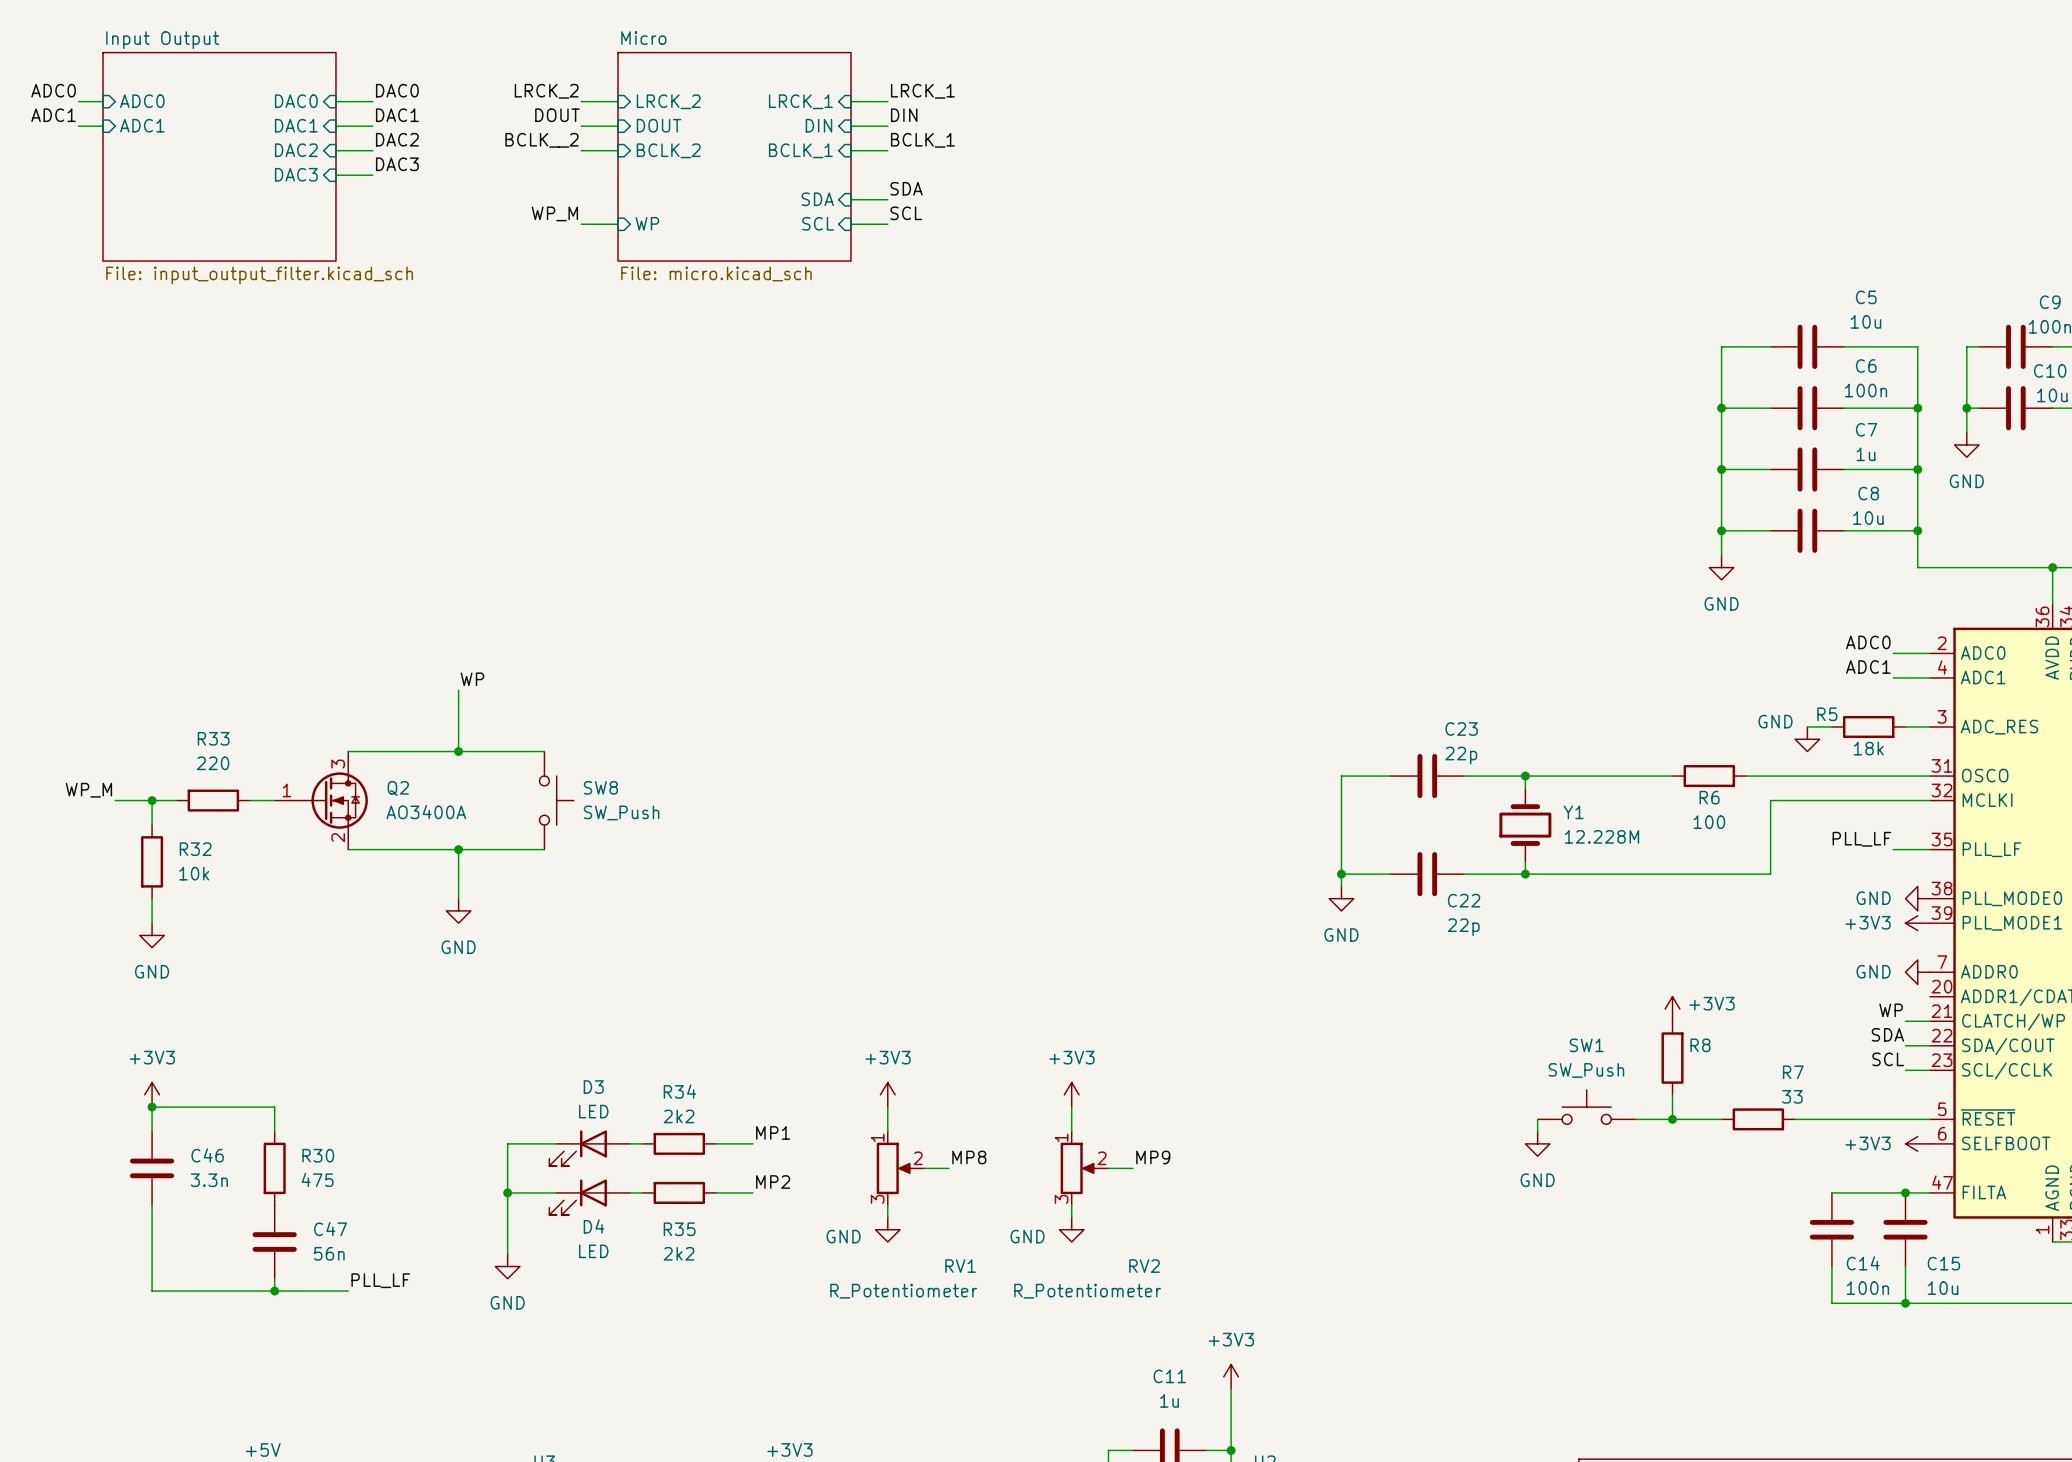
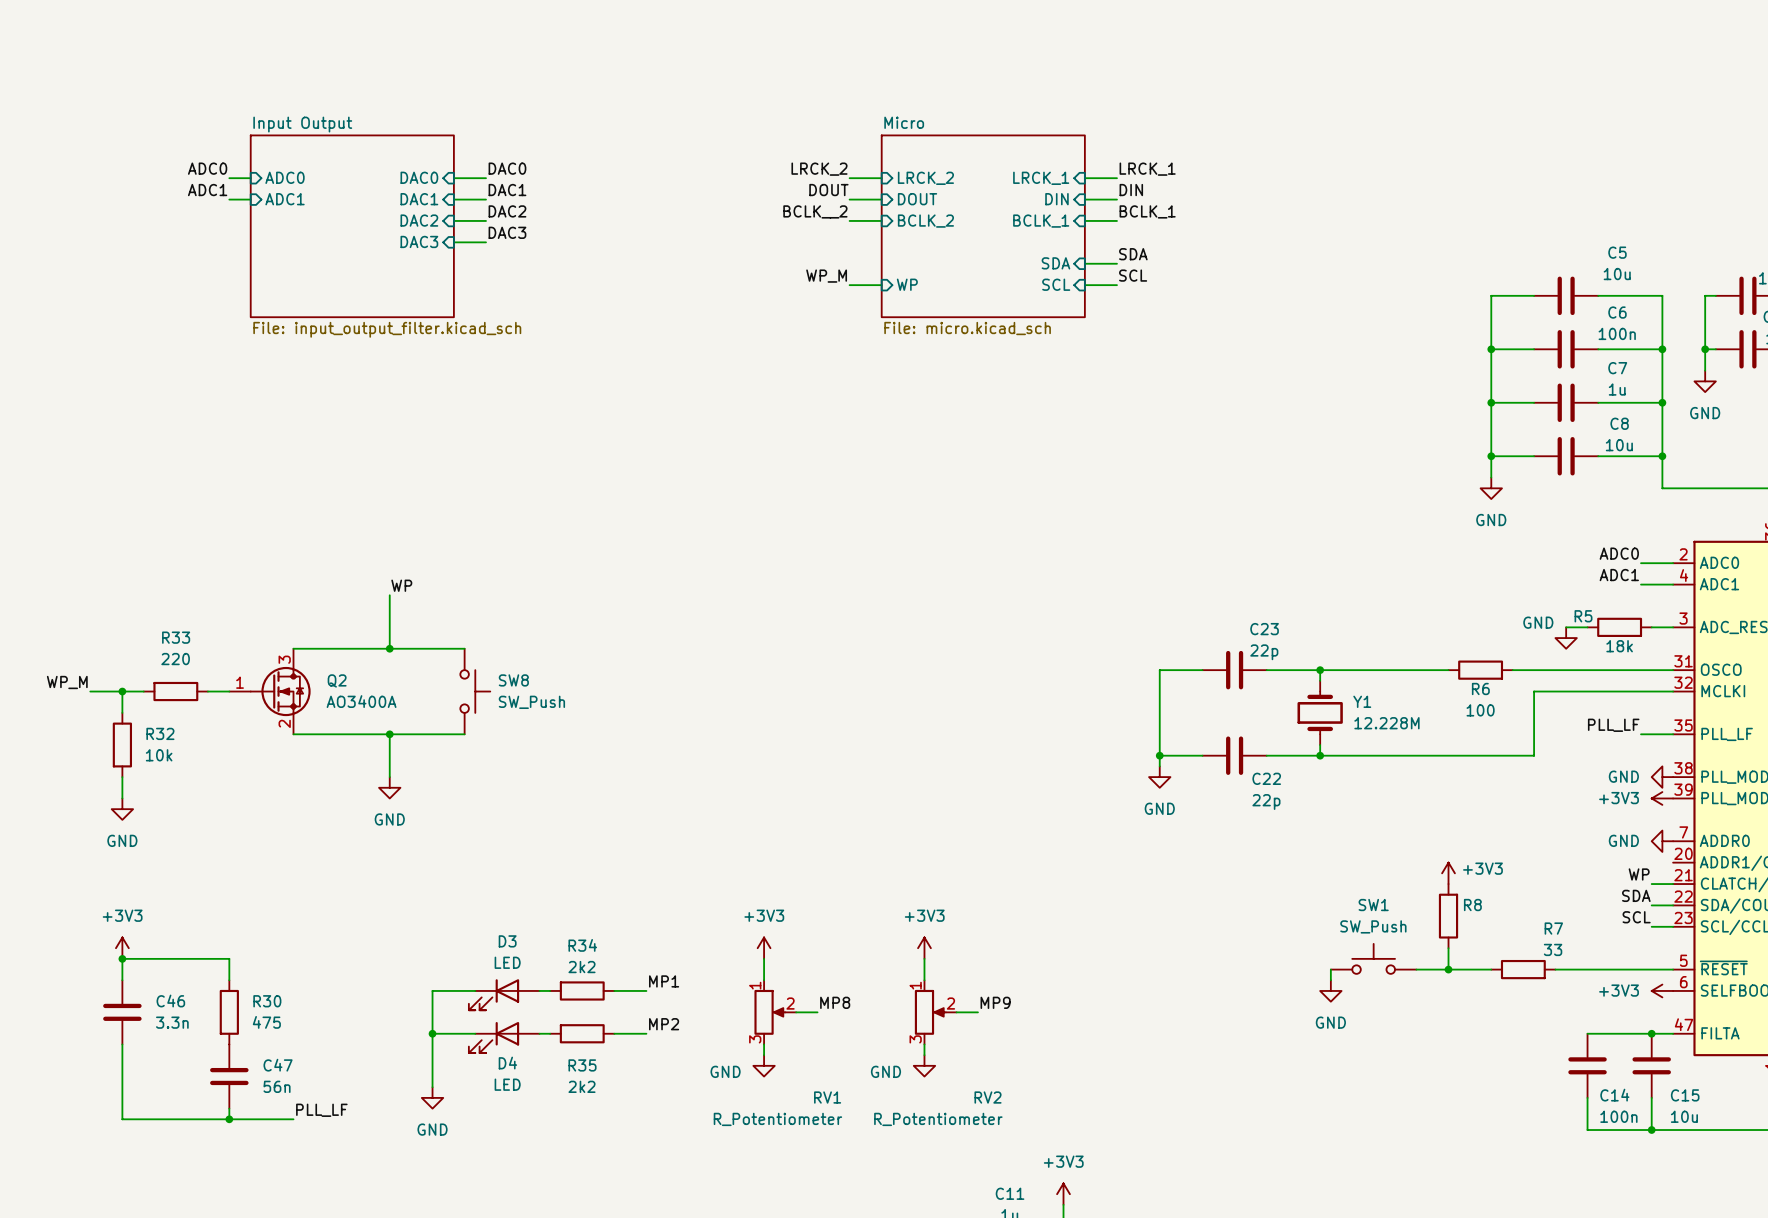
label position: ADC0 (53, 90) -> ADC0 (207, 168)
label position: DAC0 (397, 90) -> DAC0 (507, 168)
label: LRCK_2 (546, 91) -> none
label: LRCK_1 (922, 91) -> none
wire: (78, 101) (103, 101) -> (229, 178) (250, 178)
sheet pin position: ADC0 (142, 101) -> ADC0 (285, 177)
sheet pin position: DAC0 (296, 101) -> DAC0 (419, 177)
wire: (335, 101) (372, 101) -> (453, 178) (486, 178)
wire: (581, 101) (618, 101) -> none
sheet pin: LRCK_2 (668, 101) -> none
sheet pin: LRCK_1 (800, 101) -> none
wire: (850, 101) (887, 101) -> (849, 178) (881, 178)
label position: ADC1 (53, 115) -> ADC1 (207, 190)
label position: DAC1 (397, 115) -> DAC1 (507, 190)
label: DOUT (557, 115) -> none
label: DIN (904, 115) -> none
sheet pin position: ADC1 (142, 125) -> ADC1 (285, 199)
sheet pin position: DAC1 (296, 125) -> DAC1 (419, 199)
sheet pin: DOUT (659, 125) -> none
sheet pin: DIN (818, 125) -> none
wire: (78, 126) (103, 126) -> (229, 199) (250, 199)
wire: (335, 126) (372, 126) -> (453, 199) (486, 199)
wire: (581, 126) (618, 126) -> none
wire: (850, 126) (887, 126) -> (849, 199) (881, 199)
label position: DAC2 (397, 139) -> DAC2 (507, 211)
label: BCLK__2 (542, 140) -> none
label: BCLK_1 (922, 140) -> none
sheet pin position: DAC2 (296, 150) -> DAC2 (419, 220)
wire: (335, 150) (372, 150) -> (453, 220) (486, 220)
wire: (581, 150) (618, 150) -> none
sheet pin: BCLK_2 (668, 150) -> none
sheet pin: BCLK_1 (800, 150) -> none
wire: (850, 150) (887, 150) -> (849, 220) (881, 220)
sheet Input Output position: (219, 156) -> (352, 226)
sheet Micro: File: micro.kicad_sch (734, 156) -> none
label position: DAC3 (397, 164) -> DAC3 (507, 232)
sheet pin position: DAC3 (296, 174) -> DAC3 (419, 241)
wire: (335, 175) (372, 175) -> (453, 242) (486, 242)
label: SDA (906, 188) -> none
sheet pin: SDA (817, 199) -> none
wire: (850, 199) (887, 199) -> none
label: none -> LRCK_2 (819, 169)
label: none -> LRCK_1 (1147, 169)
sheet pin: none -> LRCK_2 (925, 178)
sheet pin: none -> LRCK_1 (1041, 178)
wire: none -> (1084, 178) (1116, 178)
label: WP_M (554, 213) -> none
label: SCL (906, 213) -> none
sheet pin: WP (647, 223) -> none
sheet pin: SCL (818, 223) -> none
wire: (581, 224) (618, 224) -> none
wire: (850, 224) (887, 224) -> (849, 285) (881, 285)
label: none -> DOUT (828, 190)
label: none -> DIN (1131, 190)
sheet pin: none -> DOUT (917, 199)
sheet pin: none -> DIN (1056, 199)
wire: none -> (1084, 199) (1116, 199)
label: none -> BCLK__2 (815, 211)
label: none -> BCLK_1 (1147, 211)
sheet pin: none -> BCLK_2 (925, 221)
sheet pin: none -> BCLK_1 (1041, 221)
wire: none -> (1084, 220) (1116, 220)
sheet Micro: none -> File: micro.kicad_sch (983, 226)
label: none -> SDA (1133, 254)
sheet pin: none -> SDA (1055, 263)
wire: none -> (1084, 263) (1116, 263)
label: none -> SCL (1133, 275)
label: none -> WP_M (826, 276)
sheet pin: none -> WP (907, 284)
sheet pin: none -> SCL (1056, 284)
wire: none -> (1084, 285) (1116, 285)

